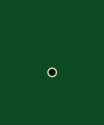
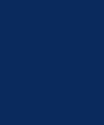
part: (52, 72) -> none

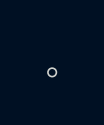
part: none -> (52, 72)

